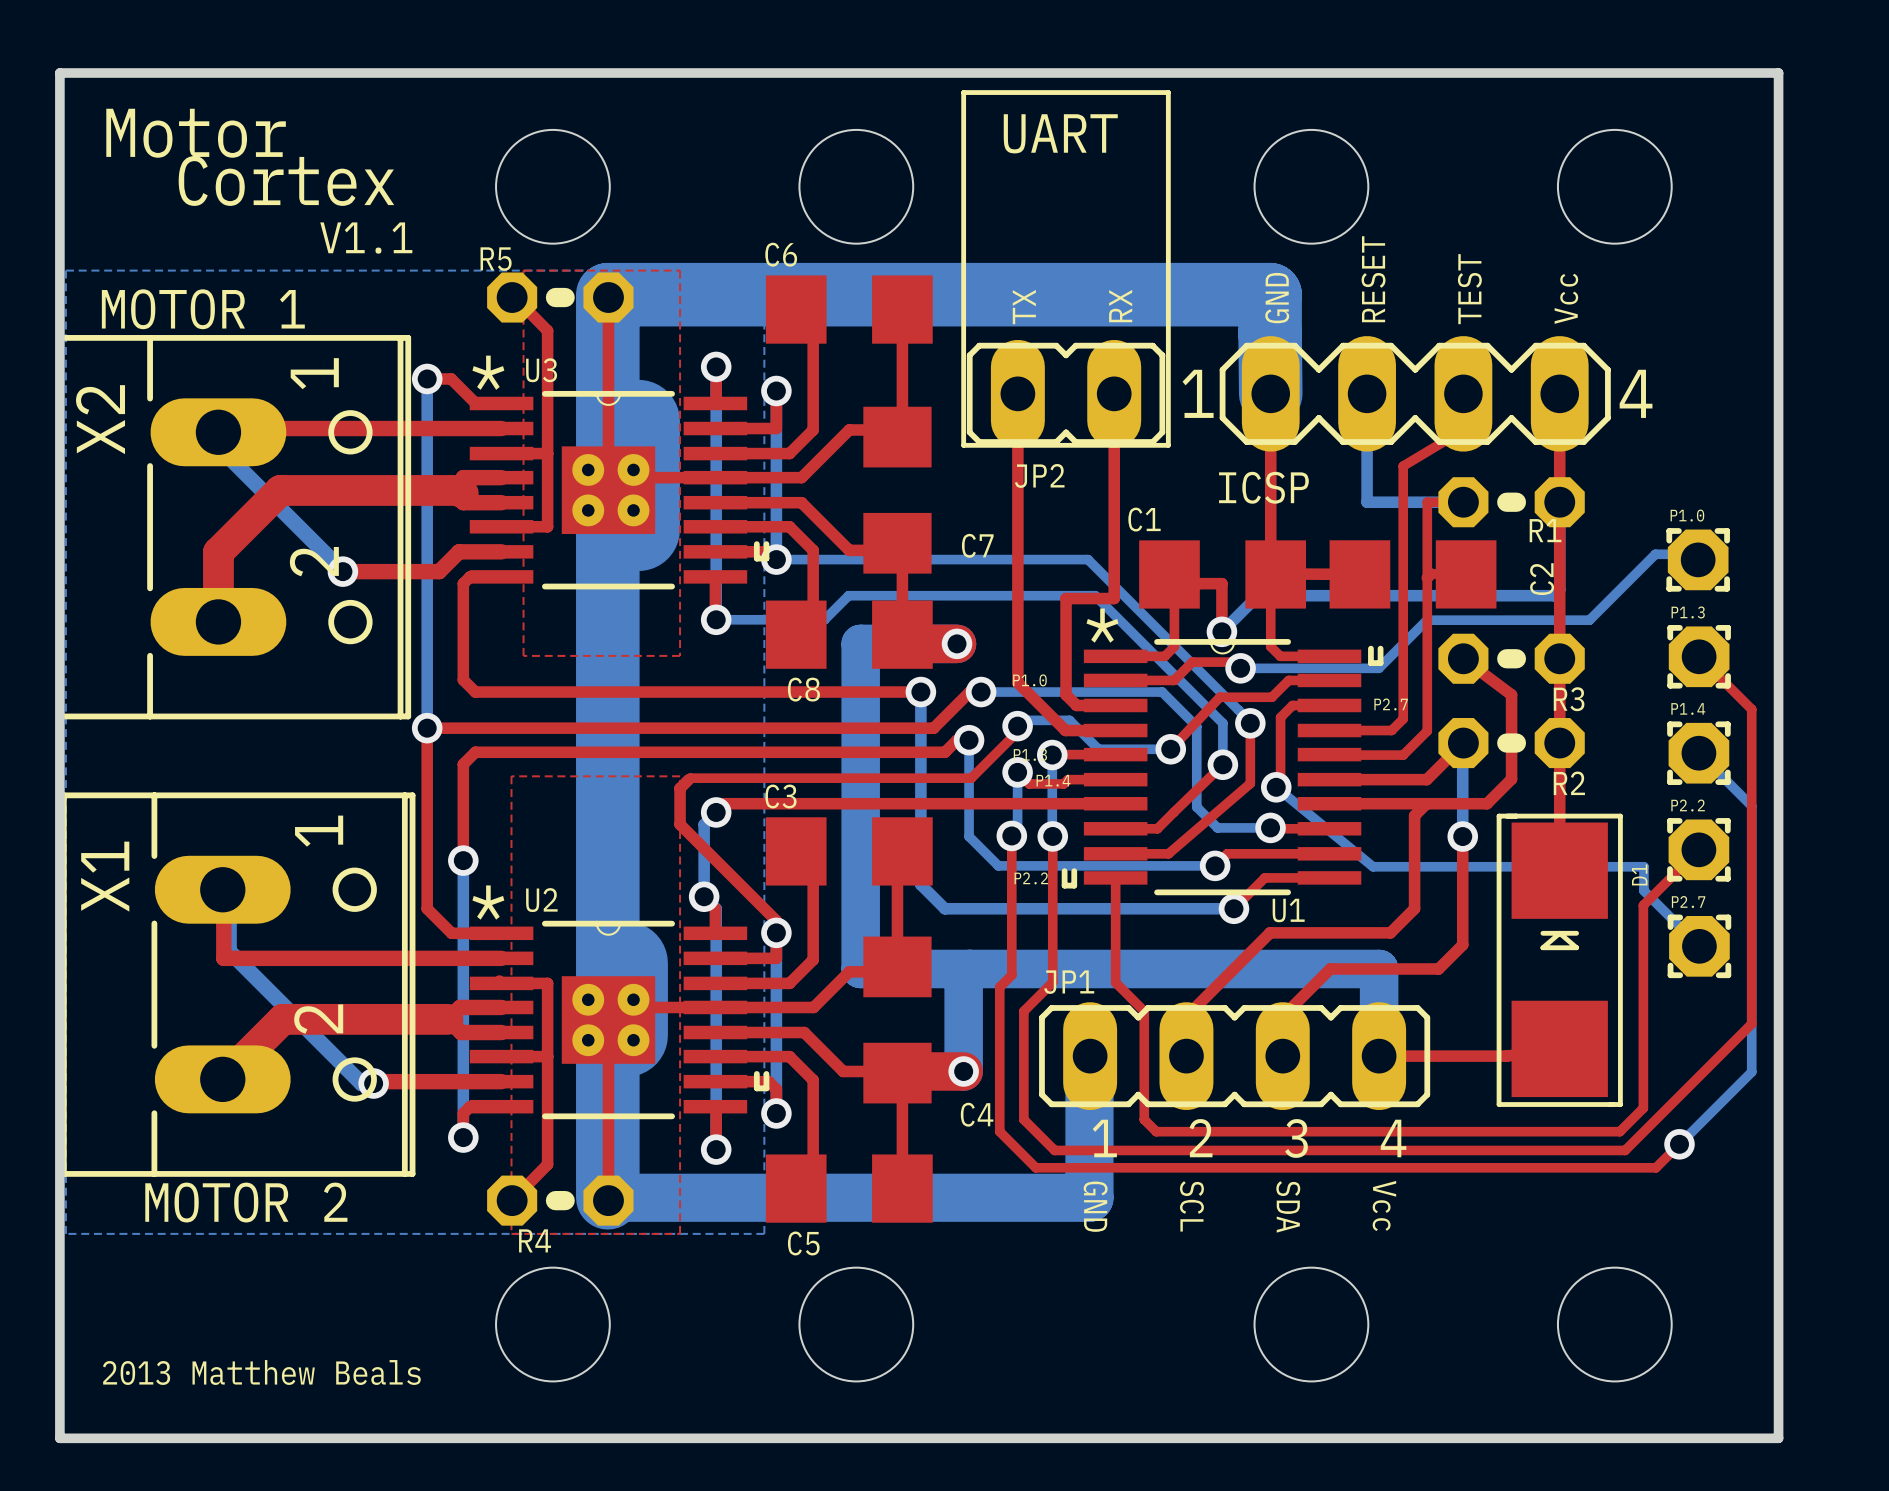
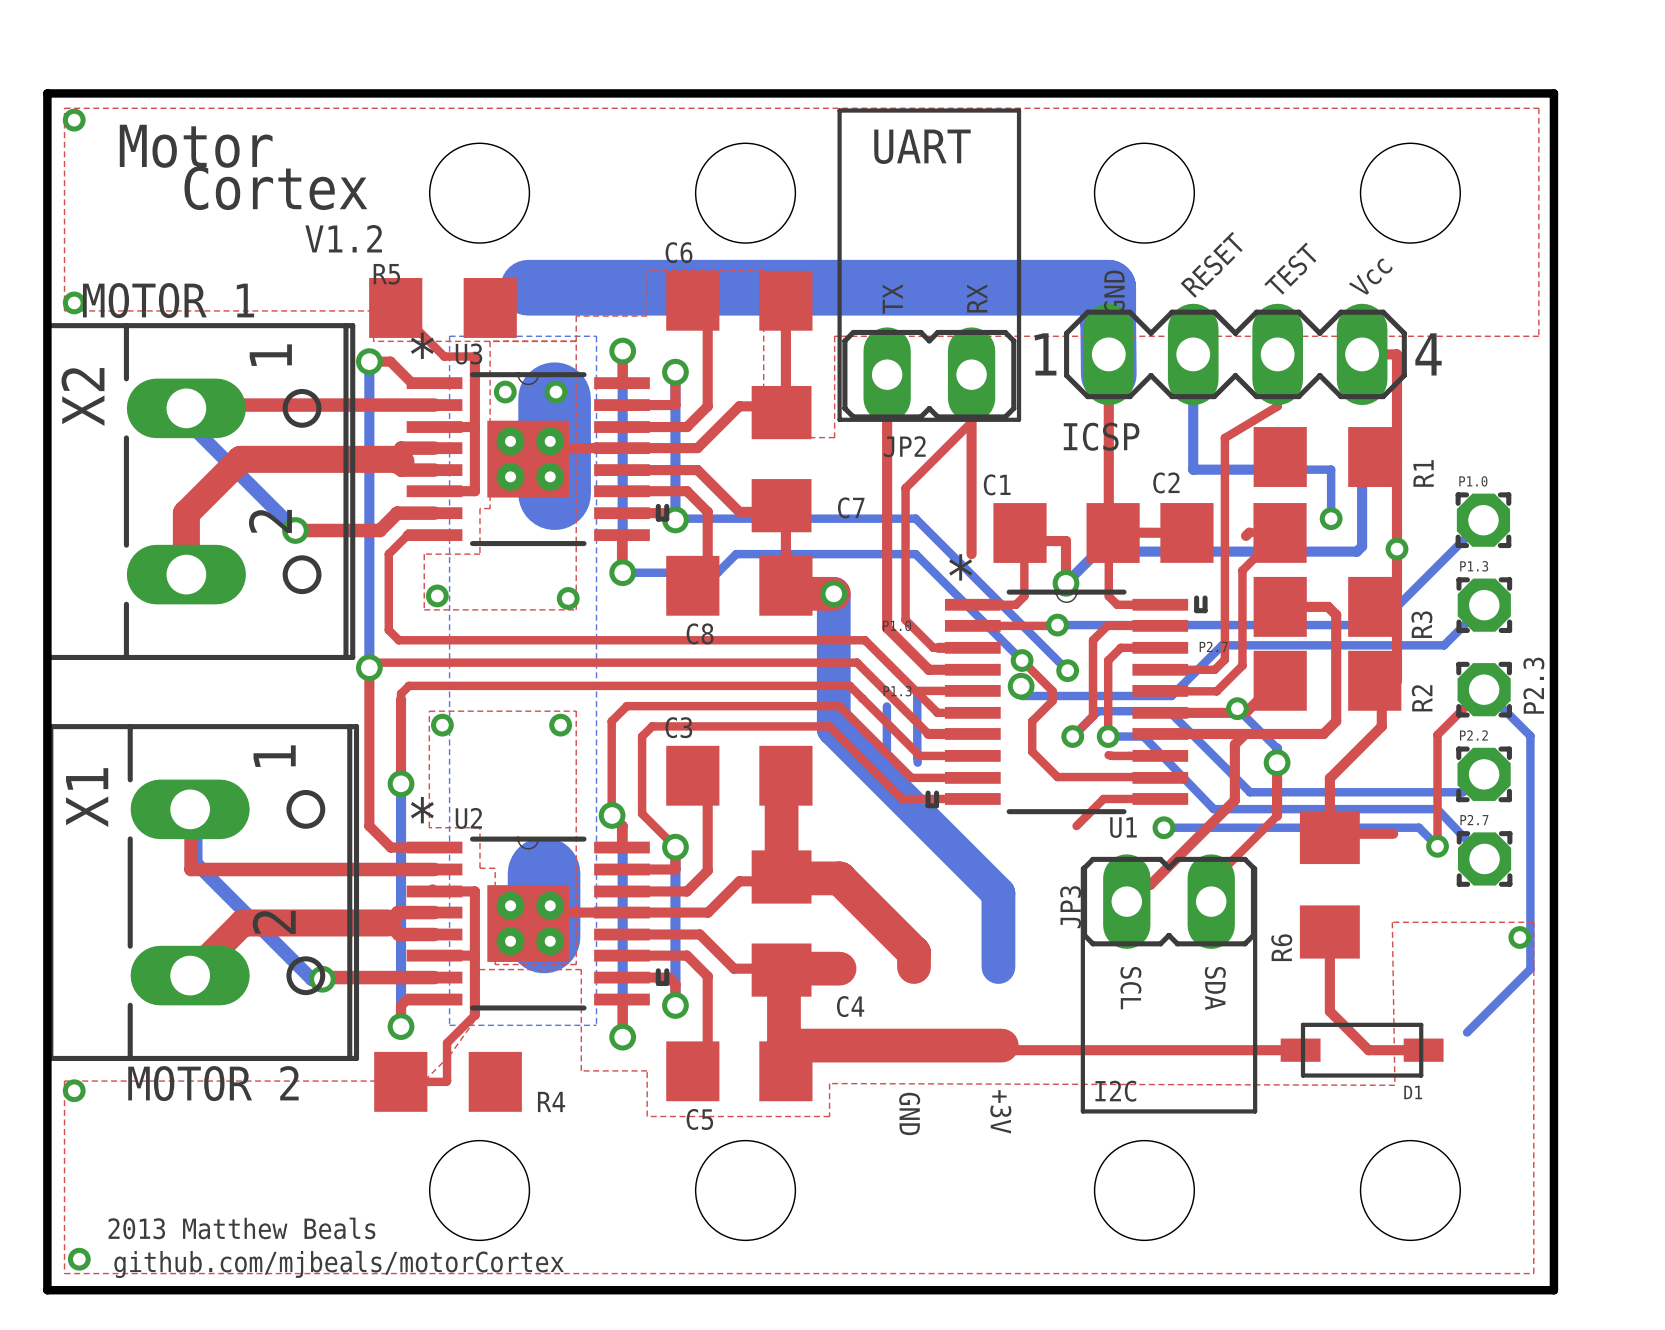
via: none -> (74, 120)
text position: Motor (196, 133) -> Motor (196, 146)
text position: Cortex (286, 181) -> Cortex (275, 188)
text: V1.1 (366, 238) -> V1.2 (343, 238)
bottom zone outline: (65, 270) (764, 270) (764, 1233) (65, 1233) (65, 270) -> none
top zone outline: (523, 270) (680, 270) (680, 655) (523, 655) (523, 270) -> none
R5 footprint: [487, 272, 634, 323] -> [369, 278, 517, 338]
text rotation: 0° (1373, 279) -> 45° clockwise (1211, 264)
text rotation: 0° (1469, 289) -> 45° clockwise (1290, 268)
bottom track: (607, 294) (607, 1197) -> none
top track: (512, 297) (512, 294) (547, 330) (547, 373) -> (395, 307) (444, 356) (474, 356)
top track: (608, 297) (608, 490) -> none
text rotation: 0° (1566, 298) -> 45° clockwise (1370, 276)
via: none -> (74, 302)
bottom zone outline: none -> (449, 336) (596, 336) (596, 1025) (449, 1025) (449, 336)
top zone outline: none -> (490, 341) (490, 508) (479, 508) (479, 554) (424, 554) (424, 609) (576, 609) (576, 316) (647, 316) (647, 270) (763, 270) (763, 437) (834, 437) (834, 336) (1538, 336) (1538, 108) (64, 108) (64, 310) (373, 310) (373, 341) (576, 341)
top track: none -> (1362, 354) (1396, 354) (1396, 680) (1374, 680) (1381, 681) (1381, 726) (1329, 778) (1329, 837) (1333, 833) (1393, 833)
ICSP position: (1415, 393) -> (1235, 354)
top track: (1559, 393) (1559, 870) -> none
via: none -> (505, 392)
via: none -> (555, 392)
R1 footprint: [1438, 477, 1585, 528] -> [1253, 427, 1402, 487]
top track: (1463, 502) (1427, 502) (1427, 731) (1403, 755) (1393, 755) -> (1280, 532) (1242, 570) (1242, 665) (1216, 691)
bottom track: none -> (1277, 469) (1331, 469) (1331, 518)
via: none -> (1331, 518)
bottom track: (776, 559) (1088, 559) (1250, 723) -> (675, 519) (915, 518) (1067, 670)
bottom track: (1698, 559) (1697, 554) (1655, 554) (1589, 620) (1427, 620) (1378, 668) (1240, 668) -> (1483, 520) (1378, 625) (1057, 625)
top track: (471, 576) (463, 583) (463, 680) (475, 692) (920, 692) -> (407, 535) (388, 554) (388, 630) (398, 640) (865, 640) (937, 712)
C2 name rotation: 0° (1542, 579) -> 90° clockwise (1166, 482)
C2 name position: C2 (1542, 579) -> C2 (1166, 482)
via: none -> (1396, 549)
bottom track: (845, 598) (848, 595) (1095, 595) (1222, 723) (1222, 764) -> (736, 554) (915, 554) (1022, 660)
top track: (1114, 598) (1066, 598) (1066, 694) (1076, 705) -> (971, 422) (905, 488) (905, 620) (933, 647) (938, 647)
R3 footprint: [1438, 633, 1585, 684] -> [1253, 576, 1402, 637]
bottom track: (957, 643) (860, 643) (860, 968) (1379, 968) (1379, 1056) -> (833, 593) (833, 728) (998, 893) (998, 967)
via: none -> (437, 595)
via: none -> (568, 598)
top track: (1699, 656) (1751, 709) (1751, 1023) (1625, 1150) (1054, 1150) (1023, 1119) (1023, 1011) (1052, 982) (1052, 836) -> none
bottom track: none -> (1484, 605) (1444, 645) (1222, 645) (1171, 696) (1022, 696)
top track: (1463, 658) (1511, 694) (1511, 779) (1487, 803) -> (1280, 606) (1328, 606) (1336, 614) (1336, 721) (1323, 733) (1298, 733)
top track: (1240, 668) (1234, 662) (1192, 662) (1174, 680) -> (1057, 625) (1024, 625)
via: (1240, 668) -> none
via: none -> (1057, 625)
top track: (1288, 680) (1271, 697) (1219, 697) (1170, 749) -> (1124, 625) (1107, 625) (1093, 640) (1093, 716) (1072, 736)
bottom track: (920, 692) (920, 884) (944, 908) (1233, 908) -> none
via: (920, 692) -> none
top track: (981, 692) (969, 692) (933, 728) (427, 728) -> (928, 733) (857, 662) (369, 662) (369, 667)
bottom track: (981, 692) (1162, 692) (1196, 726) (1196, 807) (1217, 827) (1270, 827) -> none
via: (981, 692) -> none
top track: (1292, 705) (1280, 717) (1280, 782) (1276, 787) -> (1127, 647) (1120, 647) (1108, 660) (1108, 736)
P1.4 name: P1.4 (1688, 708) -> P2.3 (1533, 685)
R2 footprint: [1438, 718, 1585, 769] -> [1253, 650, 1402, 711]
via: none -> (1022, 660)
top track: (1250, 723) (1250, 783) (1168, 853) (1115, 853) -> (611, 815) (611, 721) (626, 706) (839, 706) (911, 777) (972, 777)
via position: (1250, 723) -> (1067, 670)
top track: (1017, 726) (1017, 731) (971, 778) (690, 778) (680, 788) (680, 824) (776, 920) (776, 932) -> (972, 798) (902, 798) (829, 726) (652, 726) (642, 736) (642, 813) (675, 847)
bottom track: (1017, 726) (1023, 720) (1069, 720) (1098, 749) (1170, 749) -> none
via: (1017, 726) -> none
top track: (969, 740) (957, 740) (944, 752) (475, 752) (463, 764) -> (972, 755) (919, 755) (849, 685) (409, 685) (401, 693) (401, 699)
bottom track: (969, 740) (969, 836) (998, 865) (1215, 865) -> none
via: (969, 740) -> none
bottom track: (1463, 743) (1462, 820) -> (1237, 708) (1277, 748)
top track: none -> (1484, 688) (1437, 734) (1437, 846)
via: (1052, 755) -> none
top track: (1222, 764) (1157, 828) (1115, 828) -> none
via: (1222, 764) -> none
top track: (1017, 772) (1029, 783) (1063, 783) (1068, 779) (1075, 779) -> none
via: (1017, 772) -> none
via: none -> (1237, 708)
top zone outline: (511, 776) (680, 776) (680, 1233) (511, 1233) (511, 776) -> (429, 711) (429, 827) (479, 827) (479, 868) (495, 868) (495, 964) (576, 964) (576, 711) (429, 711)
text: P1.4 (1053, 780) -> none
bottom track: (1276, 787) (1373, 866) (1643, 866) (1643, 890) (1699, 946) -> (1108, 736) (1143, 736) (1213, 809) (1437, 809) (1484, 858)
via: (1276, 787) -> none
via: none -> (442, 725)
via: none -> (560, 725)
top track: (1064, 803) (724, 803) (716, 812) -> none
bottom track: none -> (1072, 736) (1098, 711) (1169, 711) (1250, 792) (1462, 792) (1484, 771)
via: none -> (1072, 736)
via: none -> (1108, 736)
bottom track: (716, 812) (704, 824) (704, 896) -> none
via: (716, 812) -> none
D1 footprint: [1496, 813, 1623, 1107] -> [1280, 1022, 1444, 1078]
via: (1270, 827) -> none
top track: (1011, 835) (1011, 975) (999, 987) (999, 1131) (1035, 1167) (1655, 1167) (1679, 1144) -> none
via: (1011, 835) -> none
via: (1052, 836) -> none
top track: (1698, 849) (1643, 905) (1643, 1108) (1619, 1131) (1156, 1131) (1144, 1119) (1144, 1011) (1115, 982) (1115, 877) -> none
top track: (1329, 853) (1227, 853) (1215, 865) -> (1160, 777) (1057, 777) (1032, 751) (1032, 721) (1052, 701) (1052, 690) (1022, 660)
via: (1215, 865) -> none
top track width: thin (897, 868) (897, 966) -> thick (781, 790) (781, 876)
D1 name position: D1 (1639, 874) -> D1 (1413, 1092)
text: P2.2 (1031, 878) -> none
top track: (1414, 879) (1414, 908) (1390, 932) (1270, 932) (1186, 1016) (1186, 1056) -> (1234, 800) (1150, 884) (1126, 884) (1126, 901)
top track: (1462, 897) (1462, 944) (1438, 968) (1330, 968) (1282, 1016) (1282, 1056) -> (1277, 815) (1214, 878) (1214, 898) (1211, 901)
via: (1233, 908) -> none
bottom track: none -> (1163, 827) (1418, 827) (1437, 846)
via: none -> (1163, 827)
via: none -> (1437, 846)
line: none -> (1082, 868) (1082, 1111) (1255, 1111) (1255, 868)
top track: none -> (781, 876) (839, 878) (913, 952) (913, 967)
bottom track: (969, 968) (963, 975) (963, 1071) -> none
R6: none -> (1329, 884)
JP3: none -> (1169, 901)
top zone outline: none -> (1392, 922) (1533, 922) (1533, 1273) (64, 1273) (64, 1081) (424, 1081) (449, 1055) (474, 1020) (474, 969) (581, 969) (581, 1070) (647, 1070) (647, 1116) (829, 1116) (829, 1083) (1394, 1085) (1392, 922)
top track: (608, 1020) (608, 1200) -> none
top track: none -> (1329, 932) (1329, 1011) (1368, 1050) (1423, 1050)
via: none -> (1519, 937)
top track: (1378, 1044) (1379, 1056) (1506, 1056) (1559, 1048) -> none
bottom track: (1090, 1056) (1089, 1044) (1089, 1197) (608, 1197) (608, 1200) -> none
JP1: (1234, 1056) -> none
via: (963, 1071) -> none
top track: none -> (785, 974) (783, 974) (783, 1045) (1001, 1045) (1006, 1050) (1300, 1050)
top track: (547, 1124) (547, 1164) (512, 1200) -> (474, 1015) (447, 1043) (446, 1081) (400, 1081)
via: (1679, 1144) -> none
R4 footprint: [487, 1175, 634, 1226] -> [374, 1051, 522, 1112]
text: Vcc (1384, 1205) -> none
text position: GND (1095, 1206) -> GND (909, 1113)
text position: SCL (1191, 1206) -> SCL (1130, 988)
text position: SDA (1288, 1206) -> SDA (1215, 988)
via: none -> (74, 1090)
text: none -> I2C (1115, 1091)
text: none -> +3V (1000, 1111)
R4 name position: R4 (535, 1240) -> R4 (551, 1101)
text position: 2013 Matthew Beals (261, 1372) -> 2013 Matthew Beals (241, 1228)
via: none -> (79, 1259)
text: none -> github.com/mjbeals/motorCortex (339, 1264)

